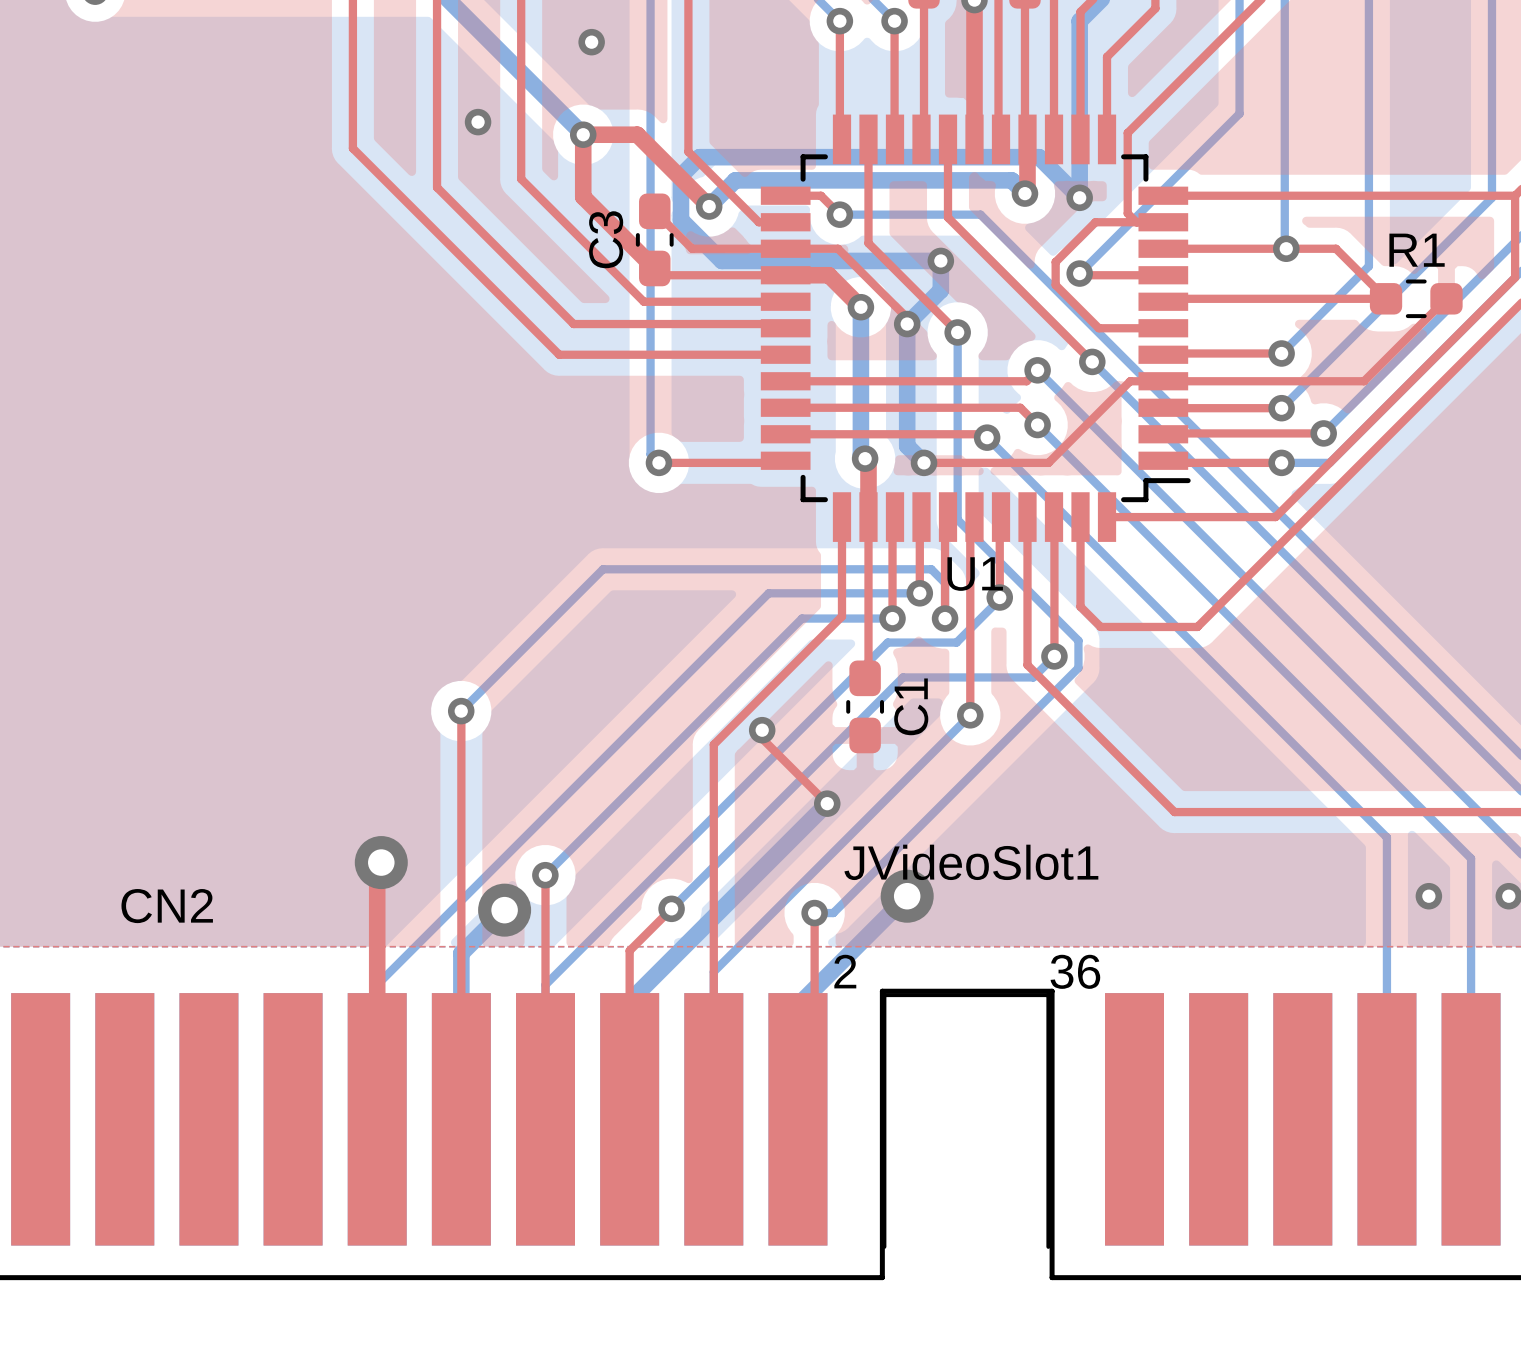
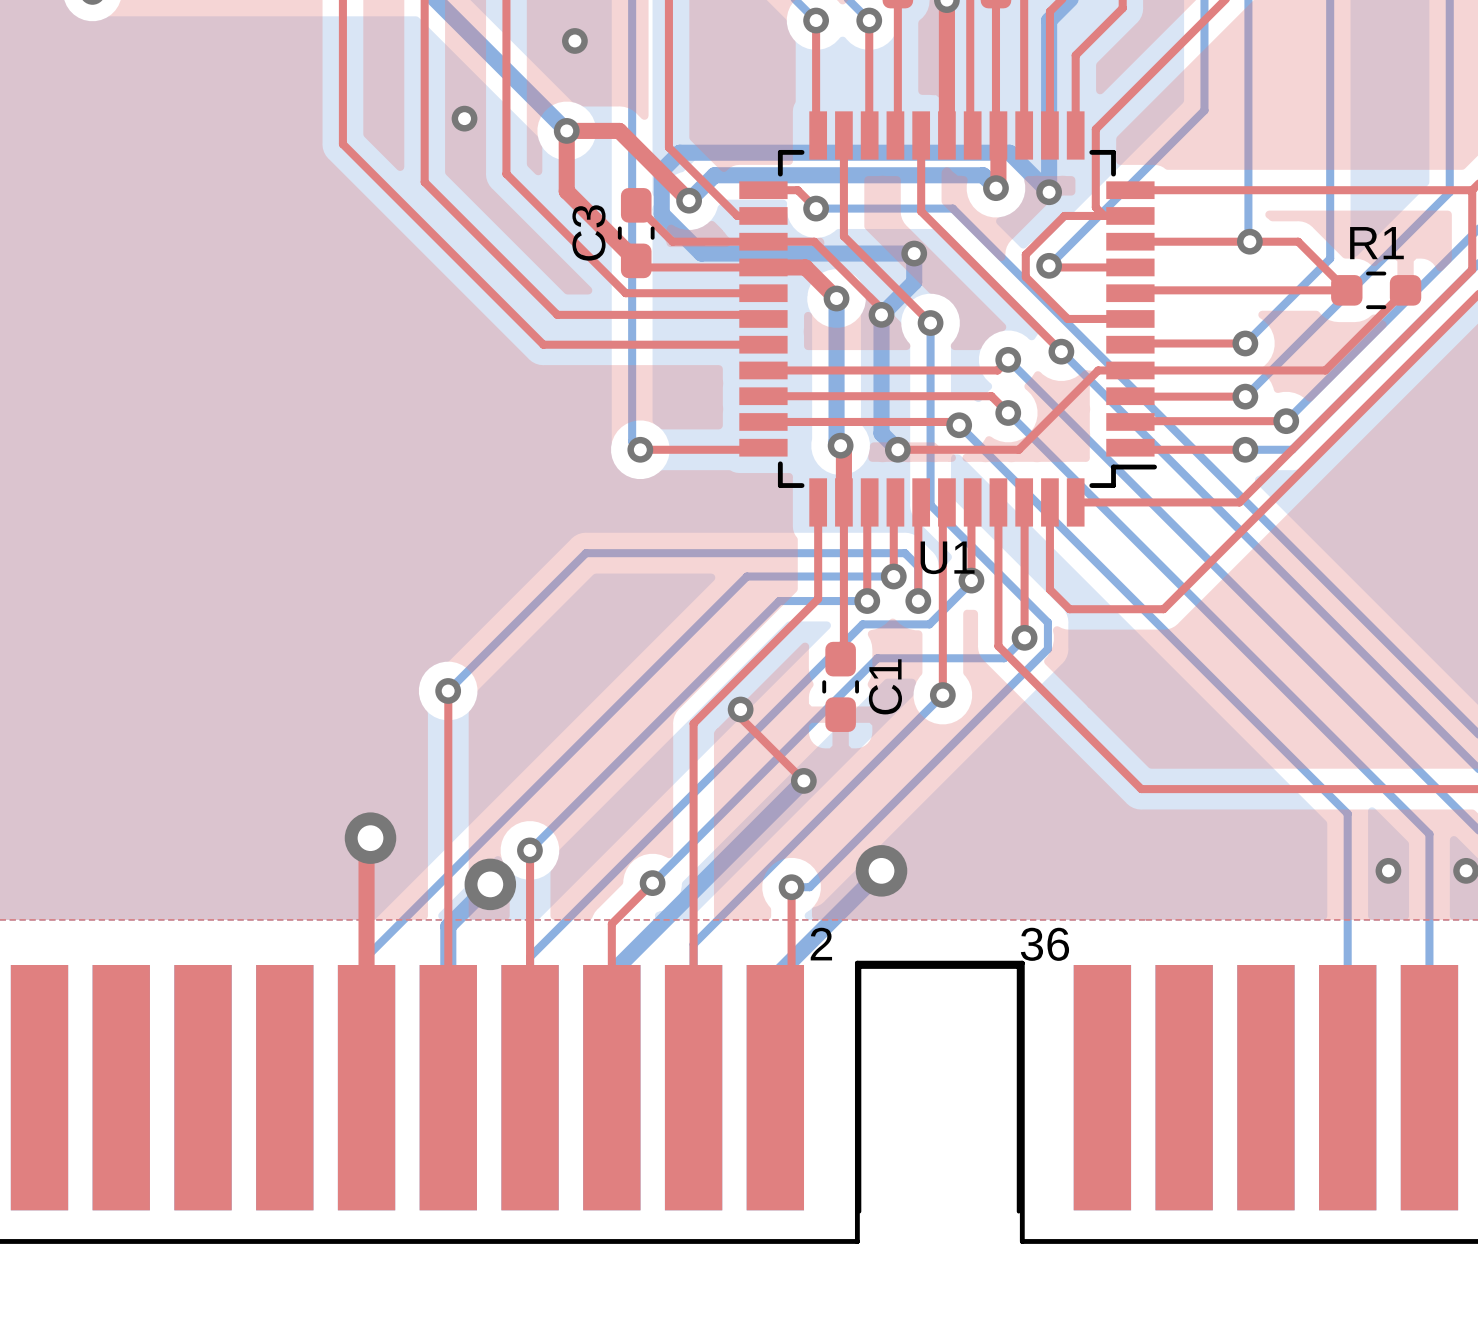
JVideoSlot1 name: JVideoSlot1 (971, 862) -> none
JVideoSlot1 text: CN2 (167, 906) -> none

